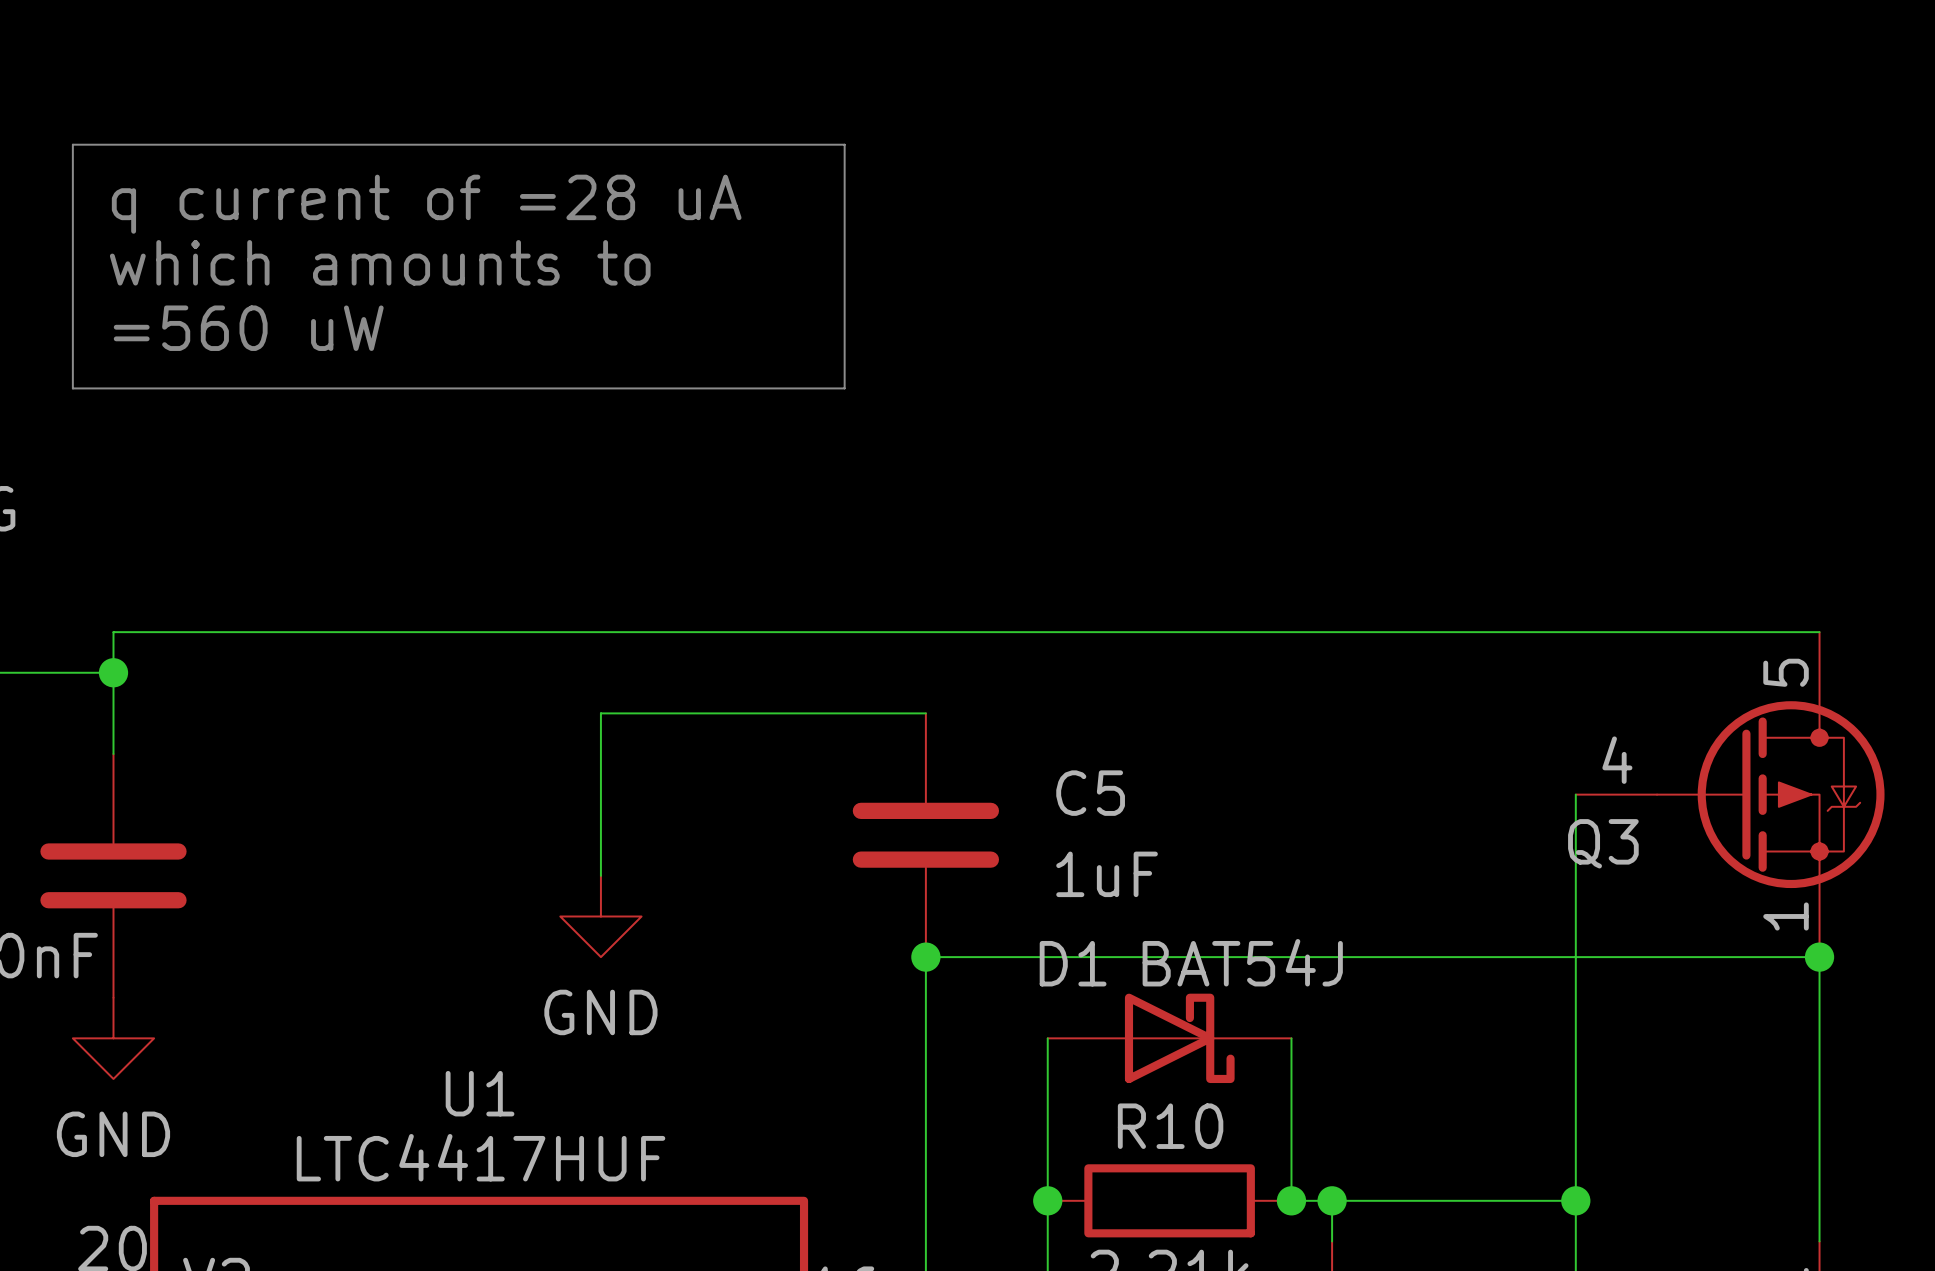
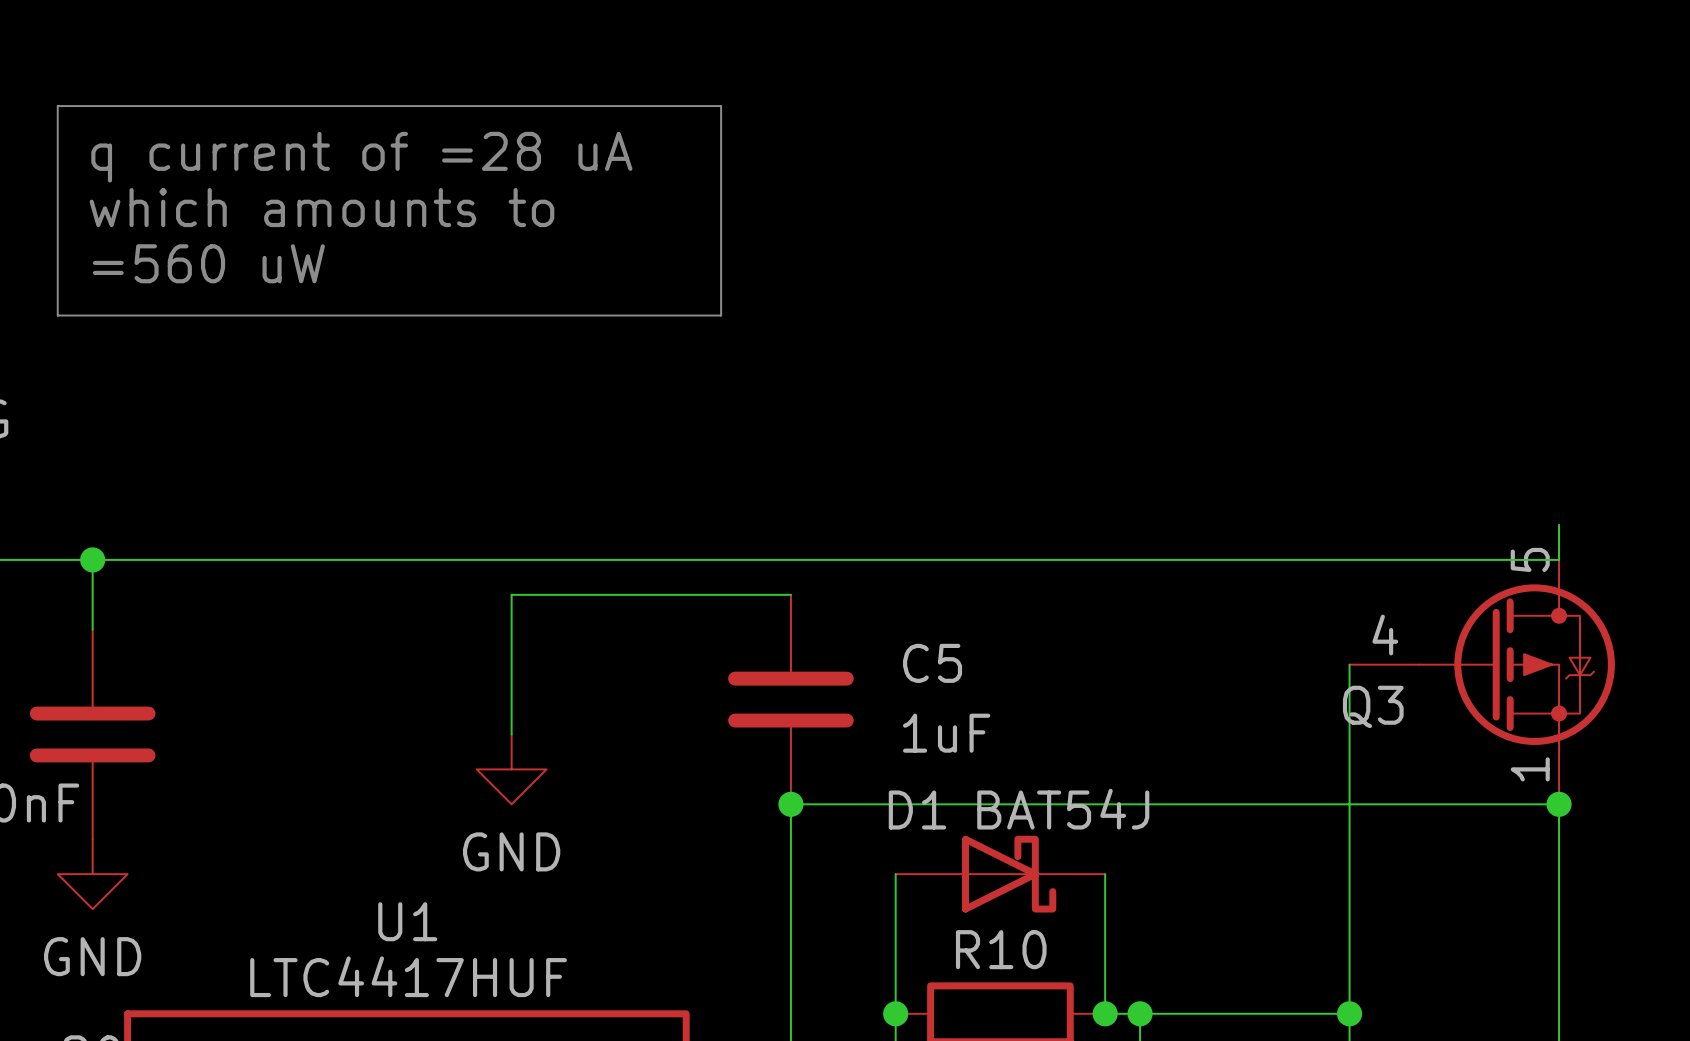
wire: (1819, 632) (113, 632) (113, 672) -> (1559, 525) (1559, 559) (92, 559)

